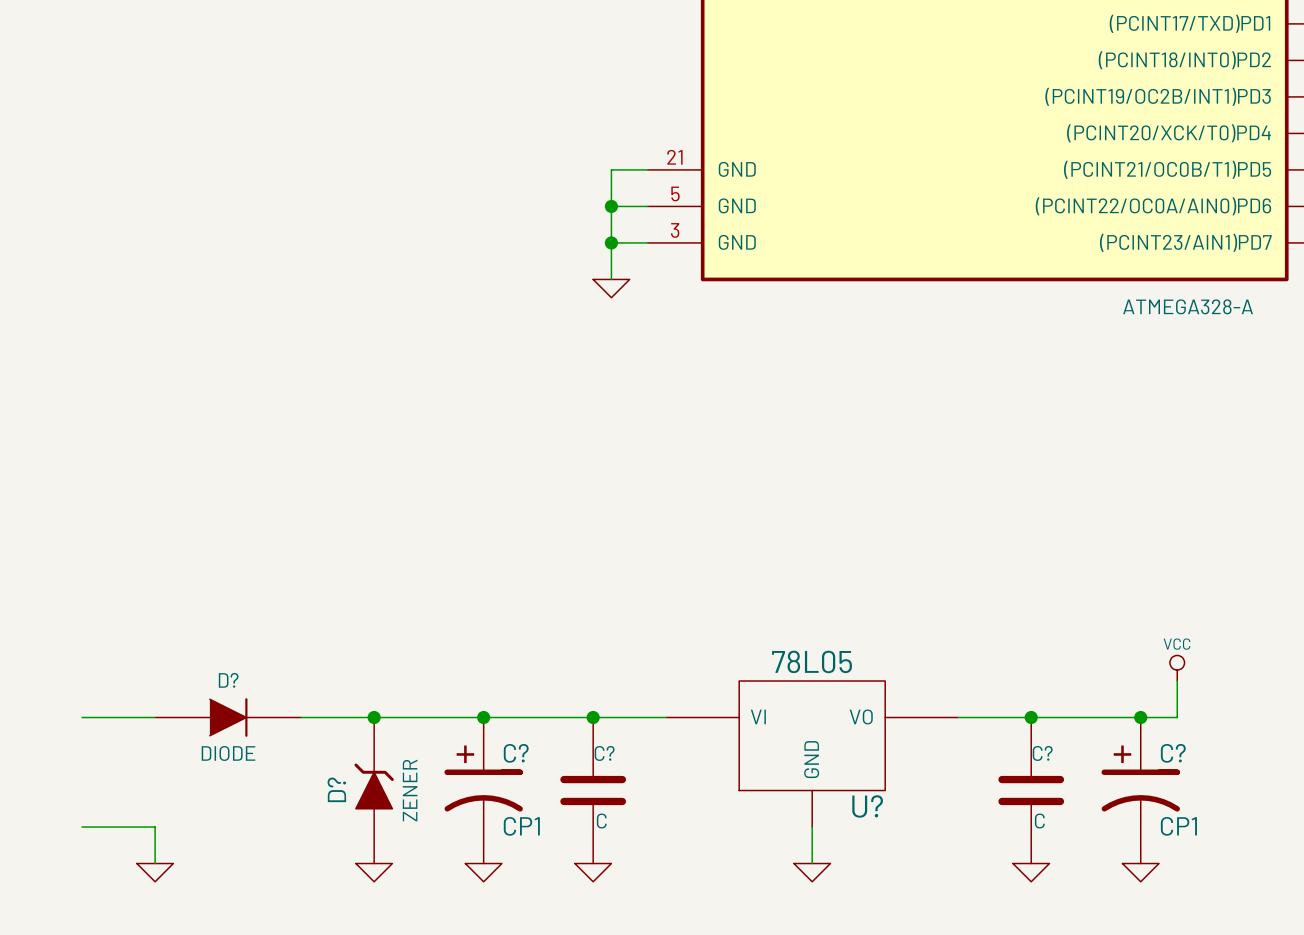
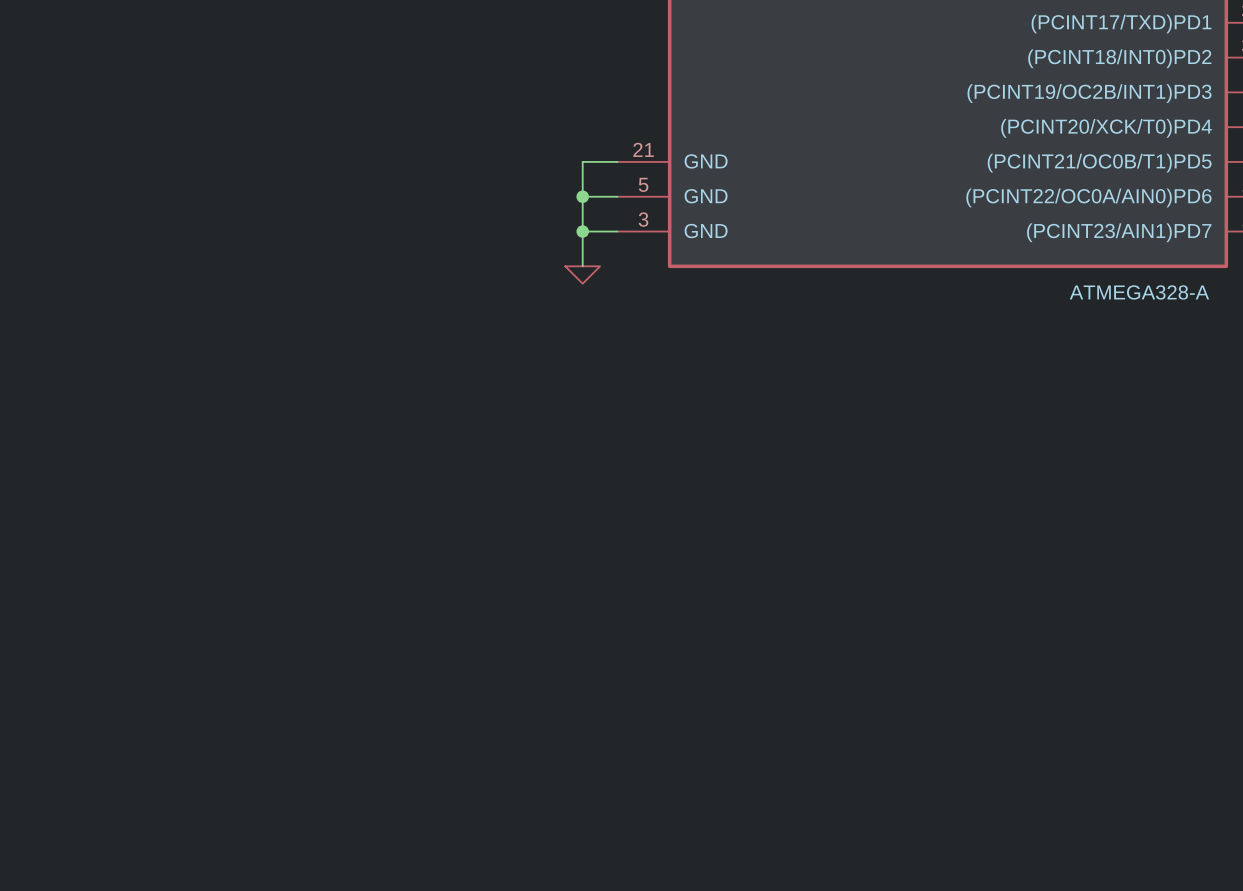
power symbol: VCC (1177, 668) -> none
wire: (1177, 681) (1177, 717) (958, 717) -> none
wire: (82, 717) (155, 717) -> none
D?: DIODE (228, 717) -> none
wire: (301, 717) (666, 717) -> none
junction: (374, 717) -> none
junction: (483, 717) -> none
junction: (593, 717) -> none
junction: (1031, 717) -> none
junction: (1140, 717) -> none
U?: 78L05 (812, 754) -> none
D?: ZENER (374, 790) -> none
C?: CP1 (483, 790) -> none
C?: C (593, 790) -> none
C?: C (1031, 790) -> none
C?: CP1 (1140, 790) -> none
wire: (82, 827) (155, 827) (155, 863) -> none
wire: (812, 827) (812, 863) -> none
power symbol: (155, 872) -> none
power symbol: (374, 872) -> none
power symbol: (483, 872) -> none
power symbol: (593, 872) -> none
power symbol: (812, 872) -> none
power symbol: (1031, 872) -> none
power symbol: (1140, 872) -> none

